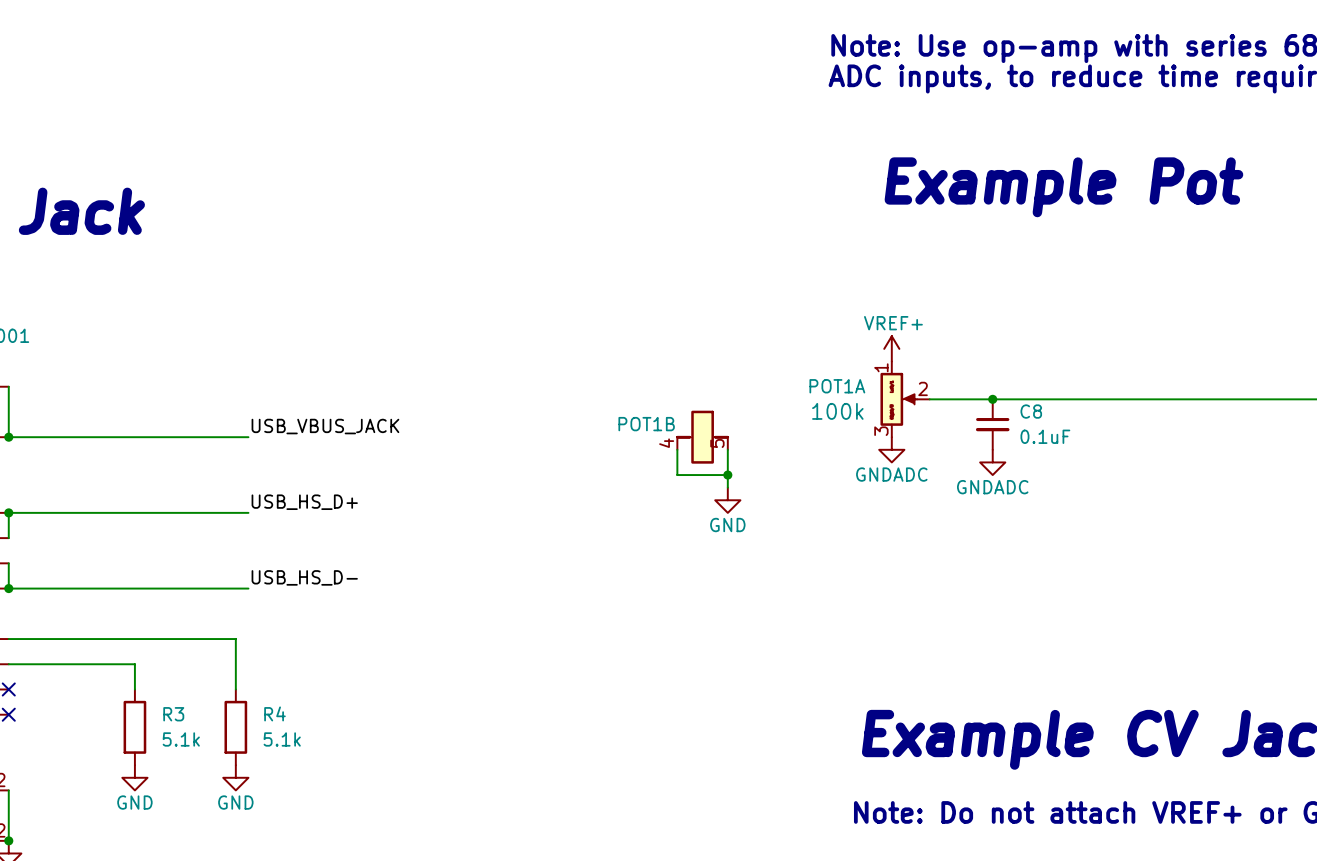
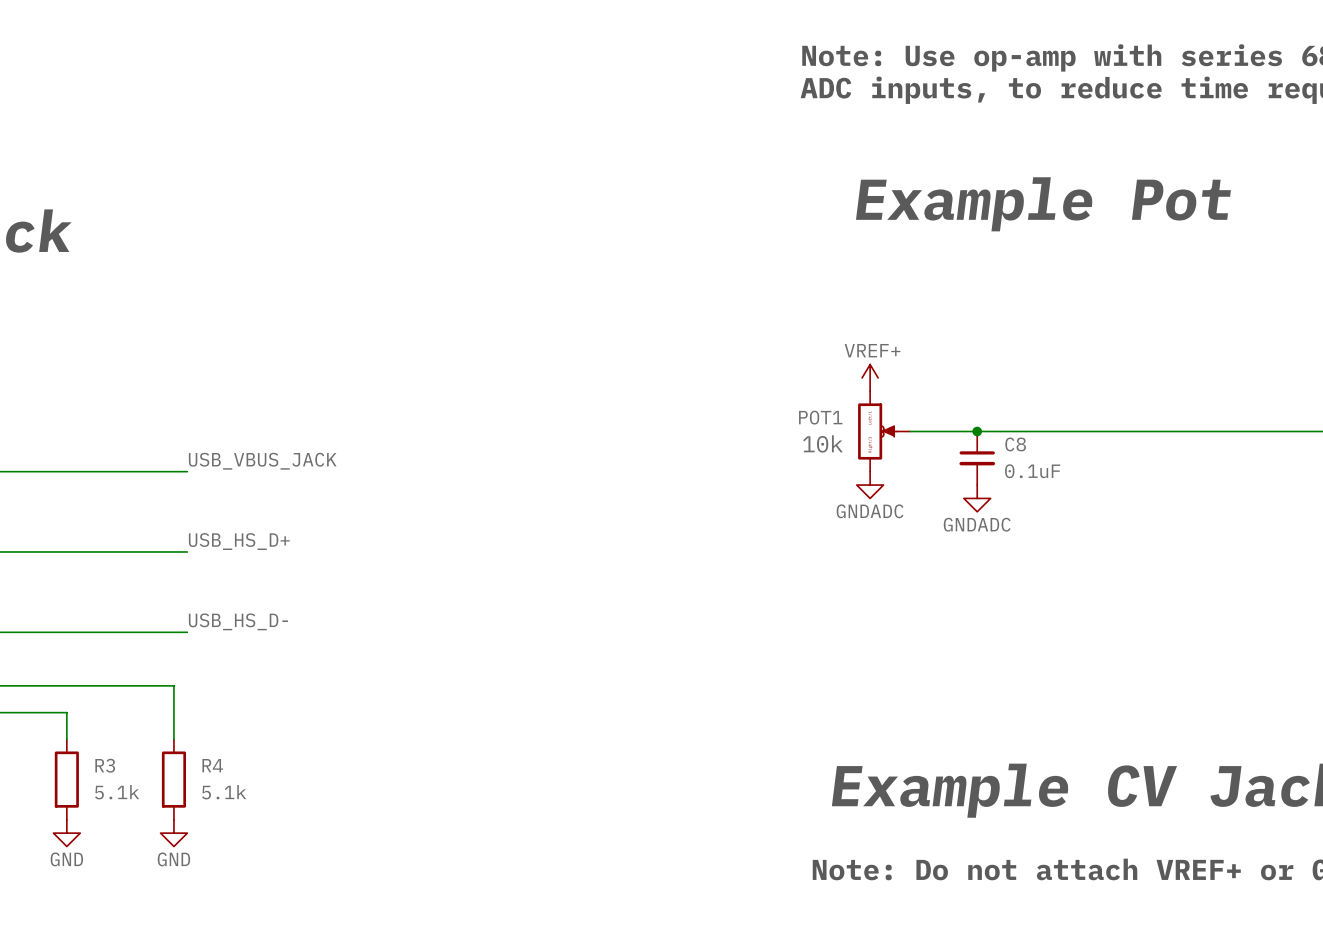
POT1A: (905, 399) -> none
POT1: none -> (884, 431)
POT1B: (702, 437) -> none
wire: (677, 449) (677, 475) (727, 475) -> none
wire: (727, 449) (727, 487) -> none
junction: (727, 475) -> none
power symbol: GND (727, 500) -> none

